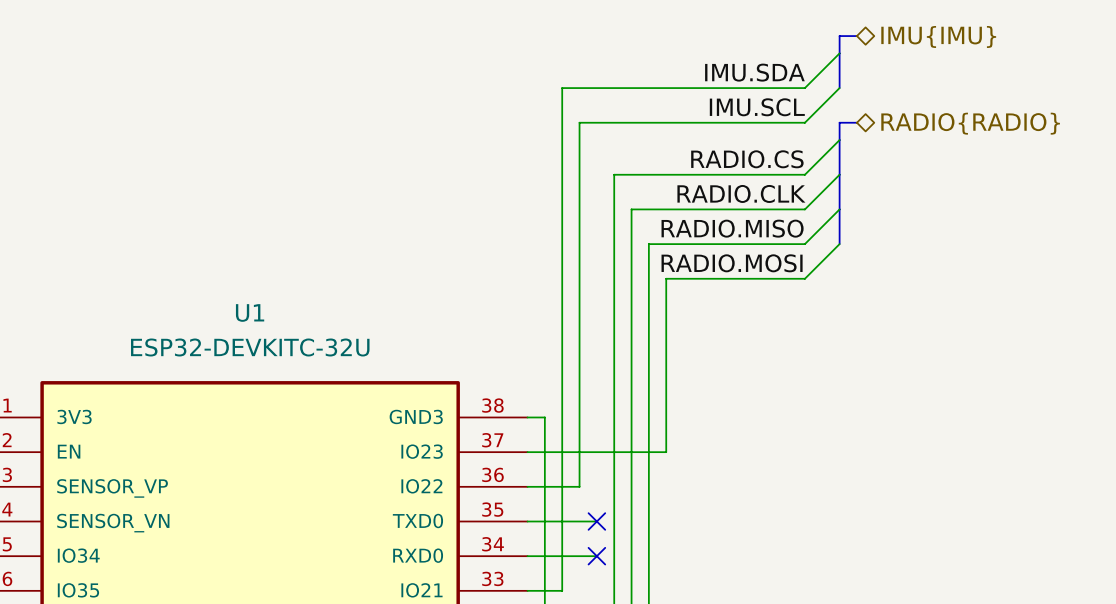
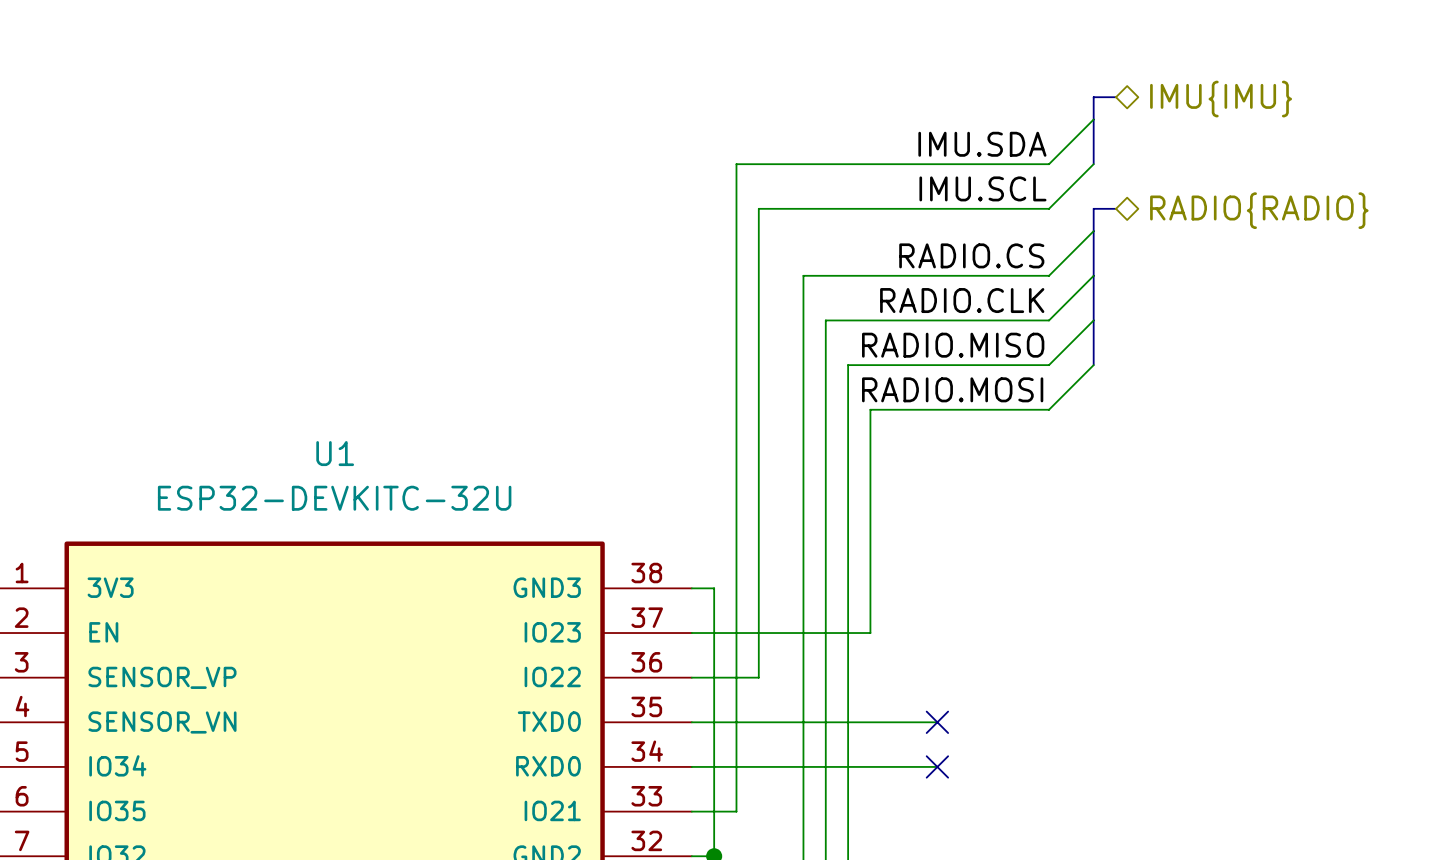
wire: none -> (781, 722) (937, 722)
no-connect mark: (596, 521) -> none
no-connect mark: none -> (937, 722)
wire: none -> (781, 766) (937, 766)
no-connect mark: (596, 556) -> none
no-connect mark: none -> (937, 766)

